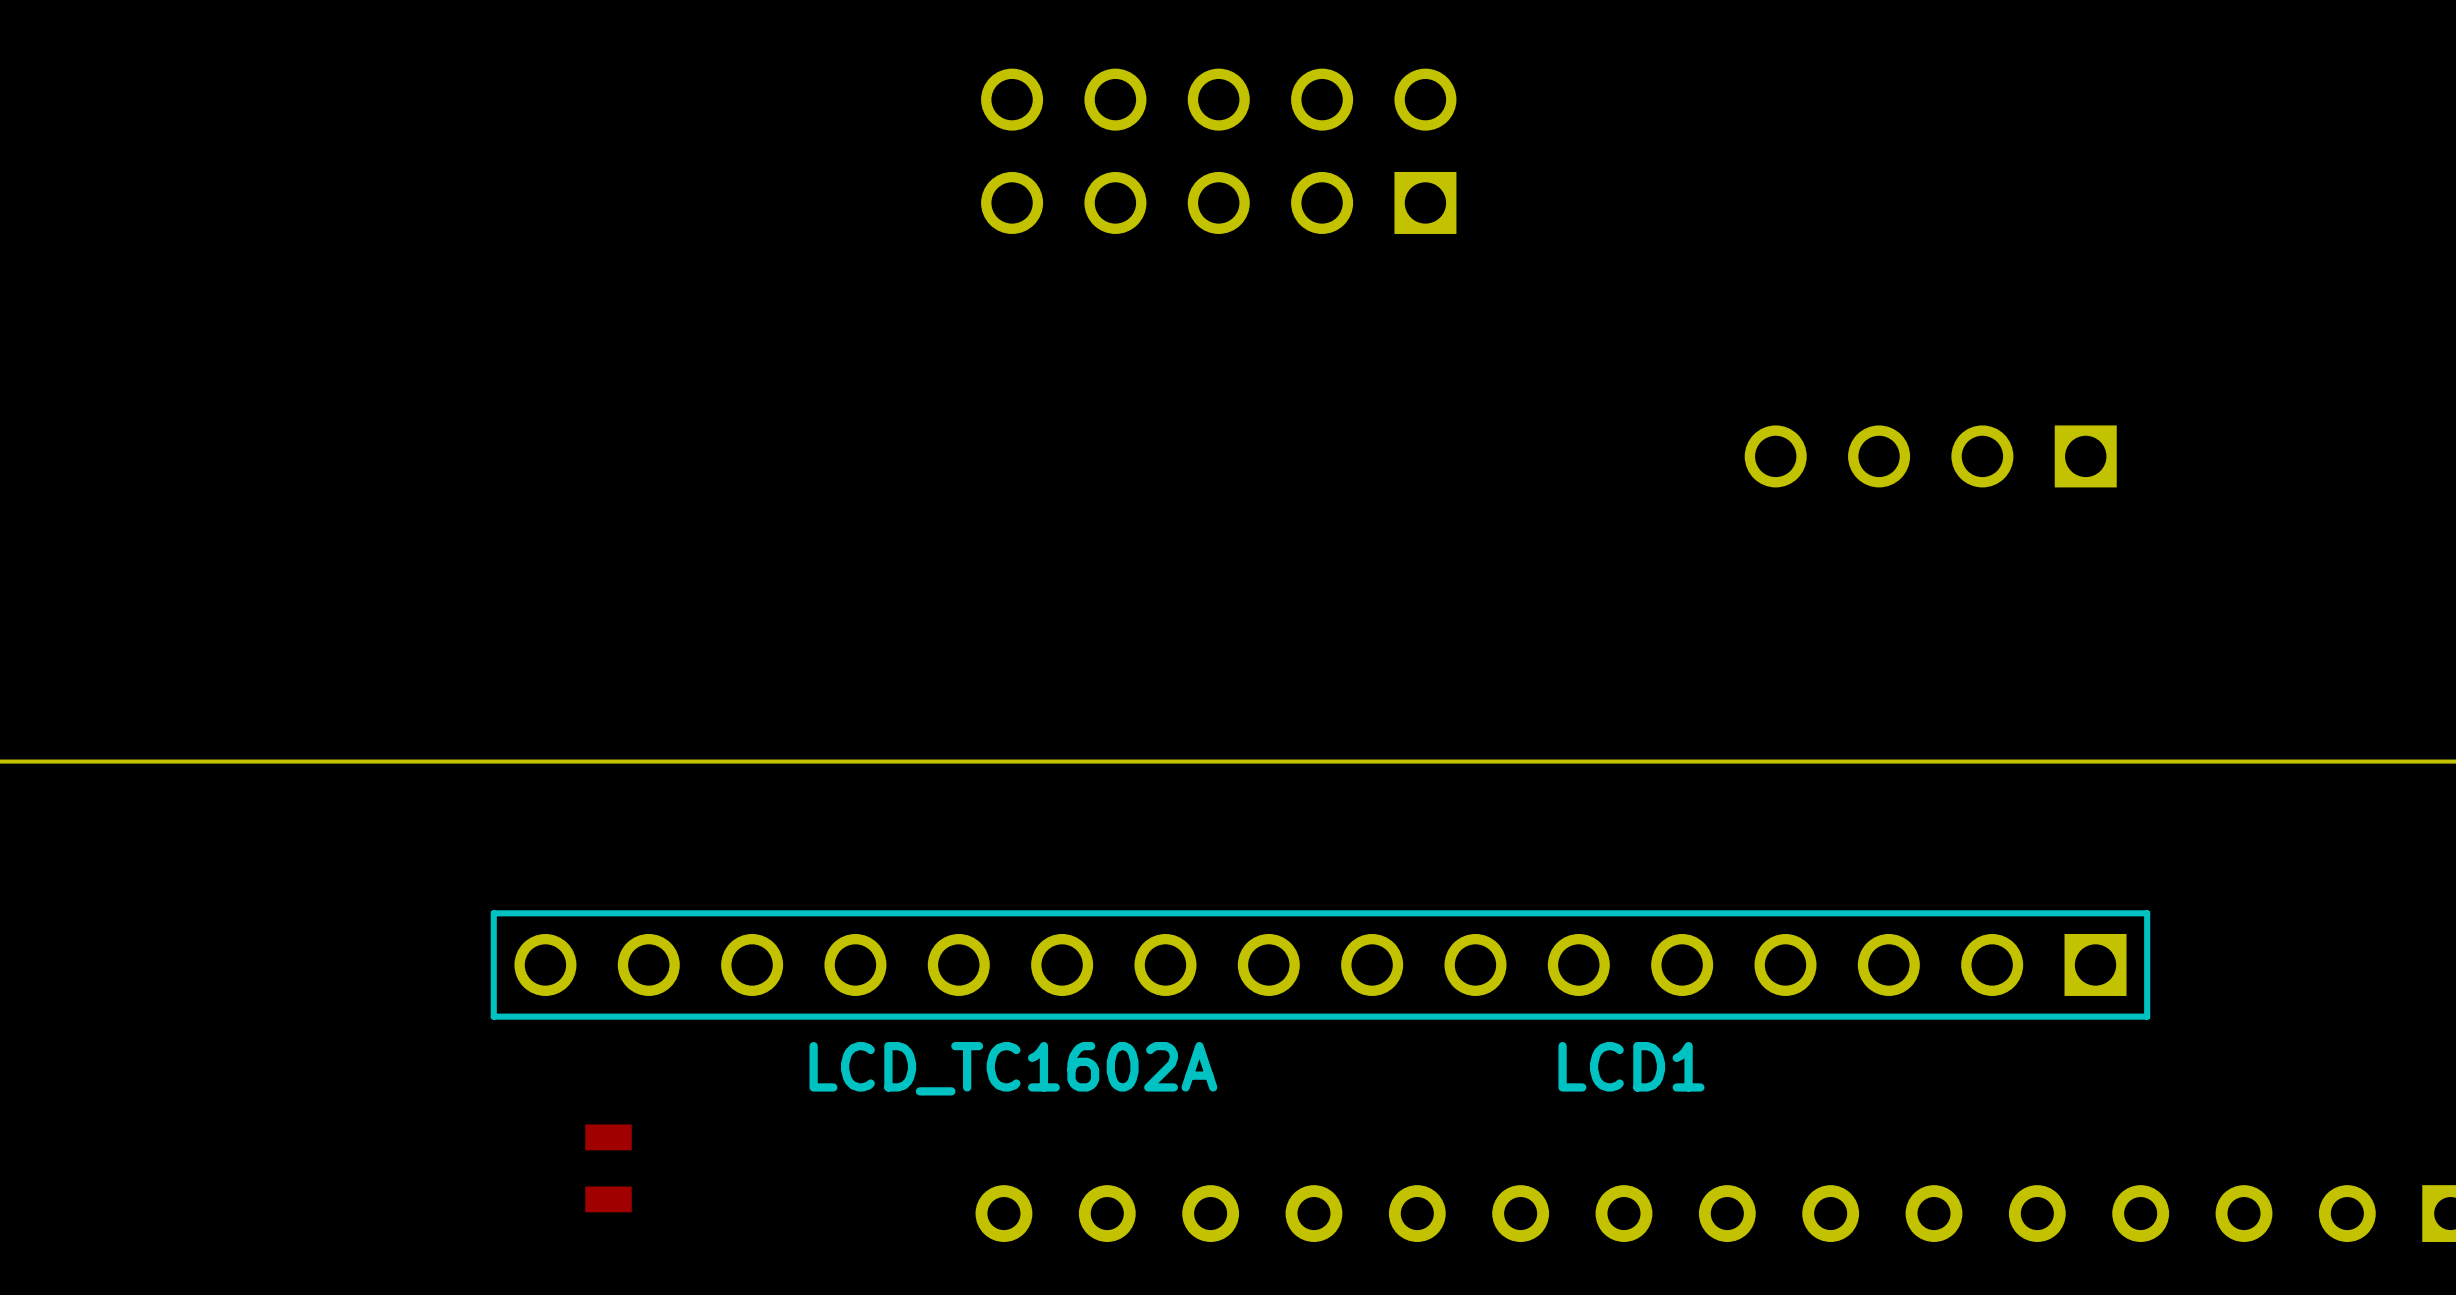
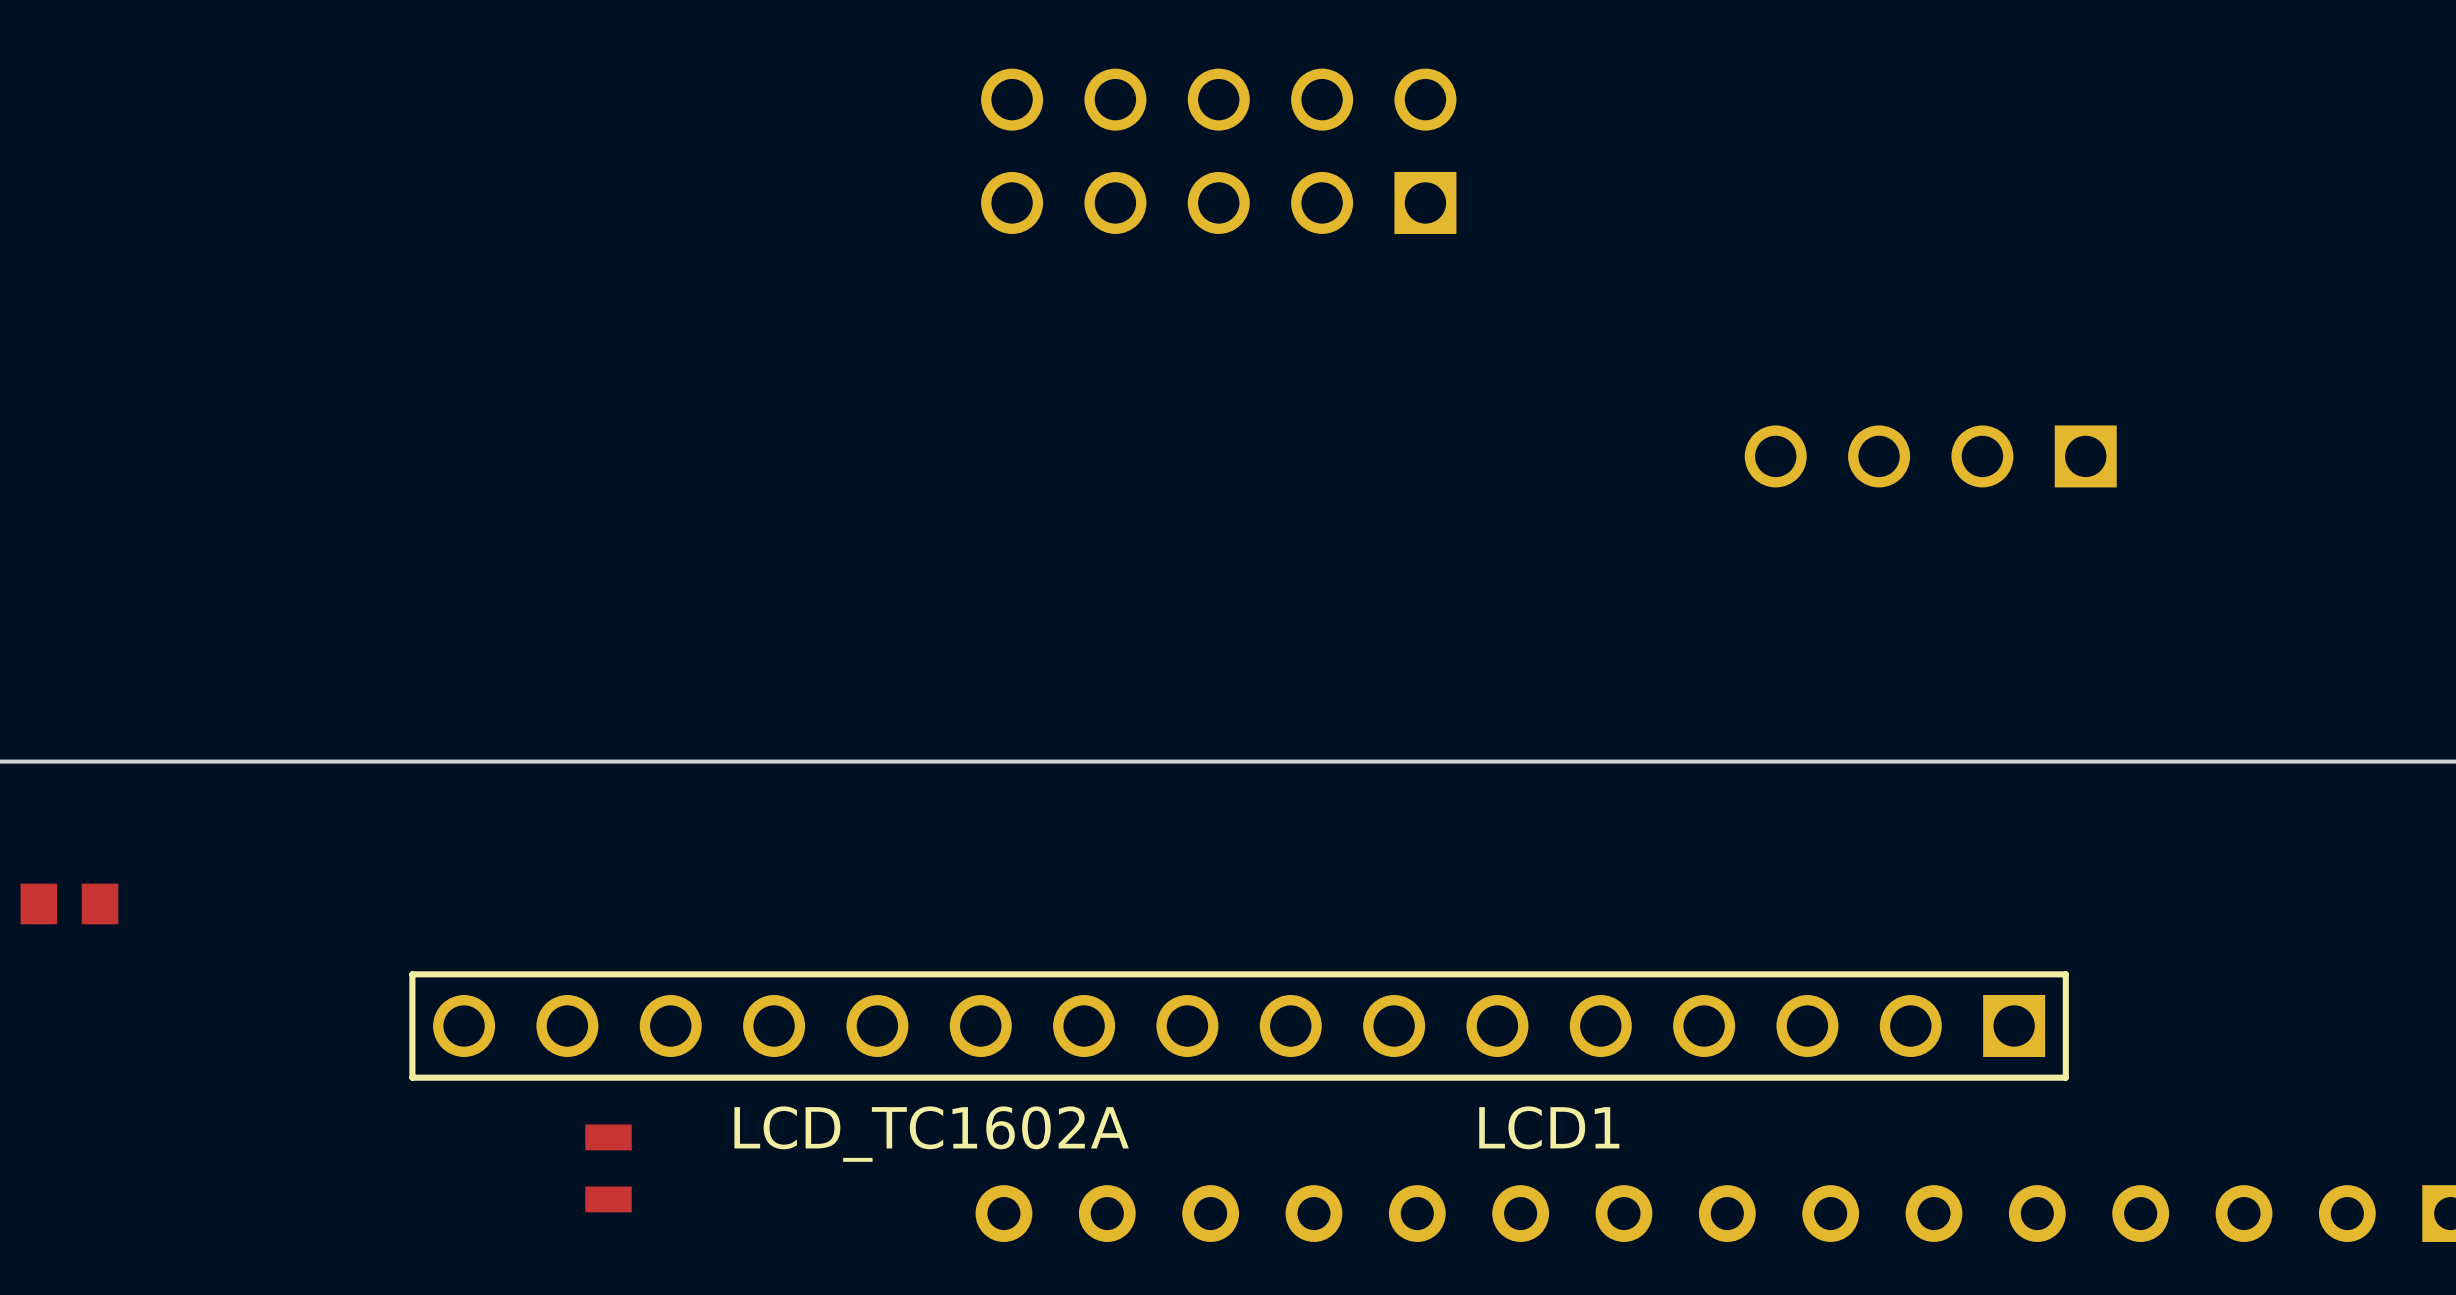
part: none -> (69, 903)
LCD1 position: (1320, 964) -> (1239, 1026)

